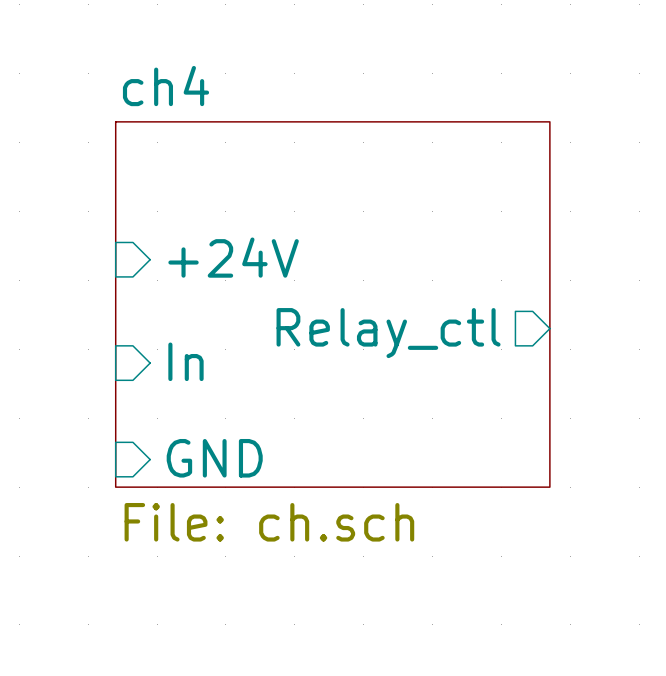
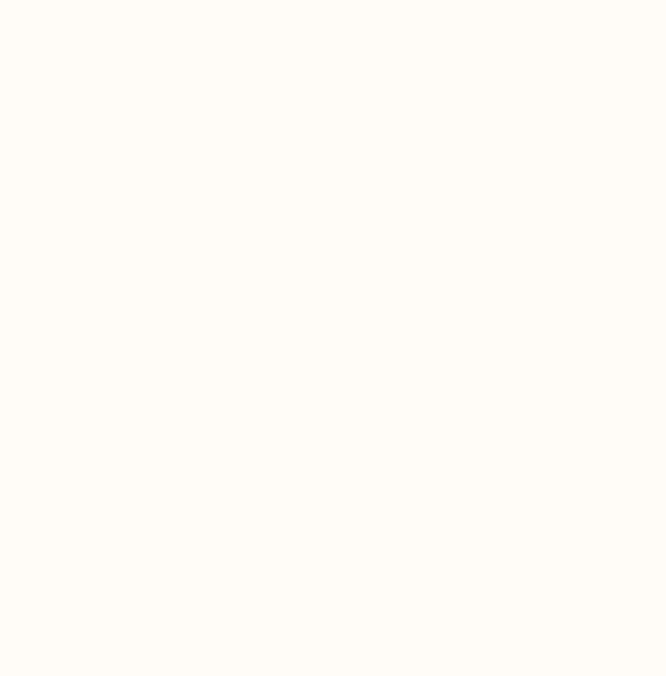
sheet pin: +24V (233, 257) -> none
sheet ch4: File: ch.sch (332, 304) -> none
sheet pin: Relay_ctl (388, 333) -> none
sheet pin: In (185, 361) -> none
sheet pin: GND (214, 458) -> none

